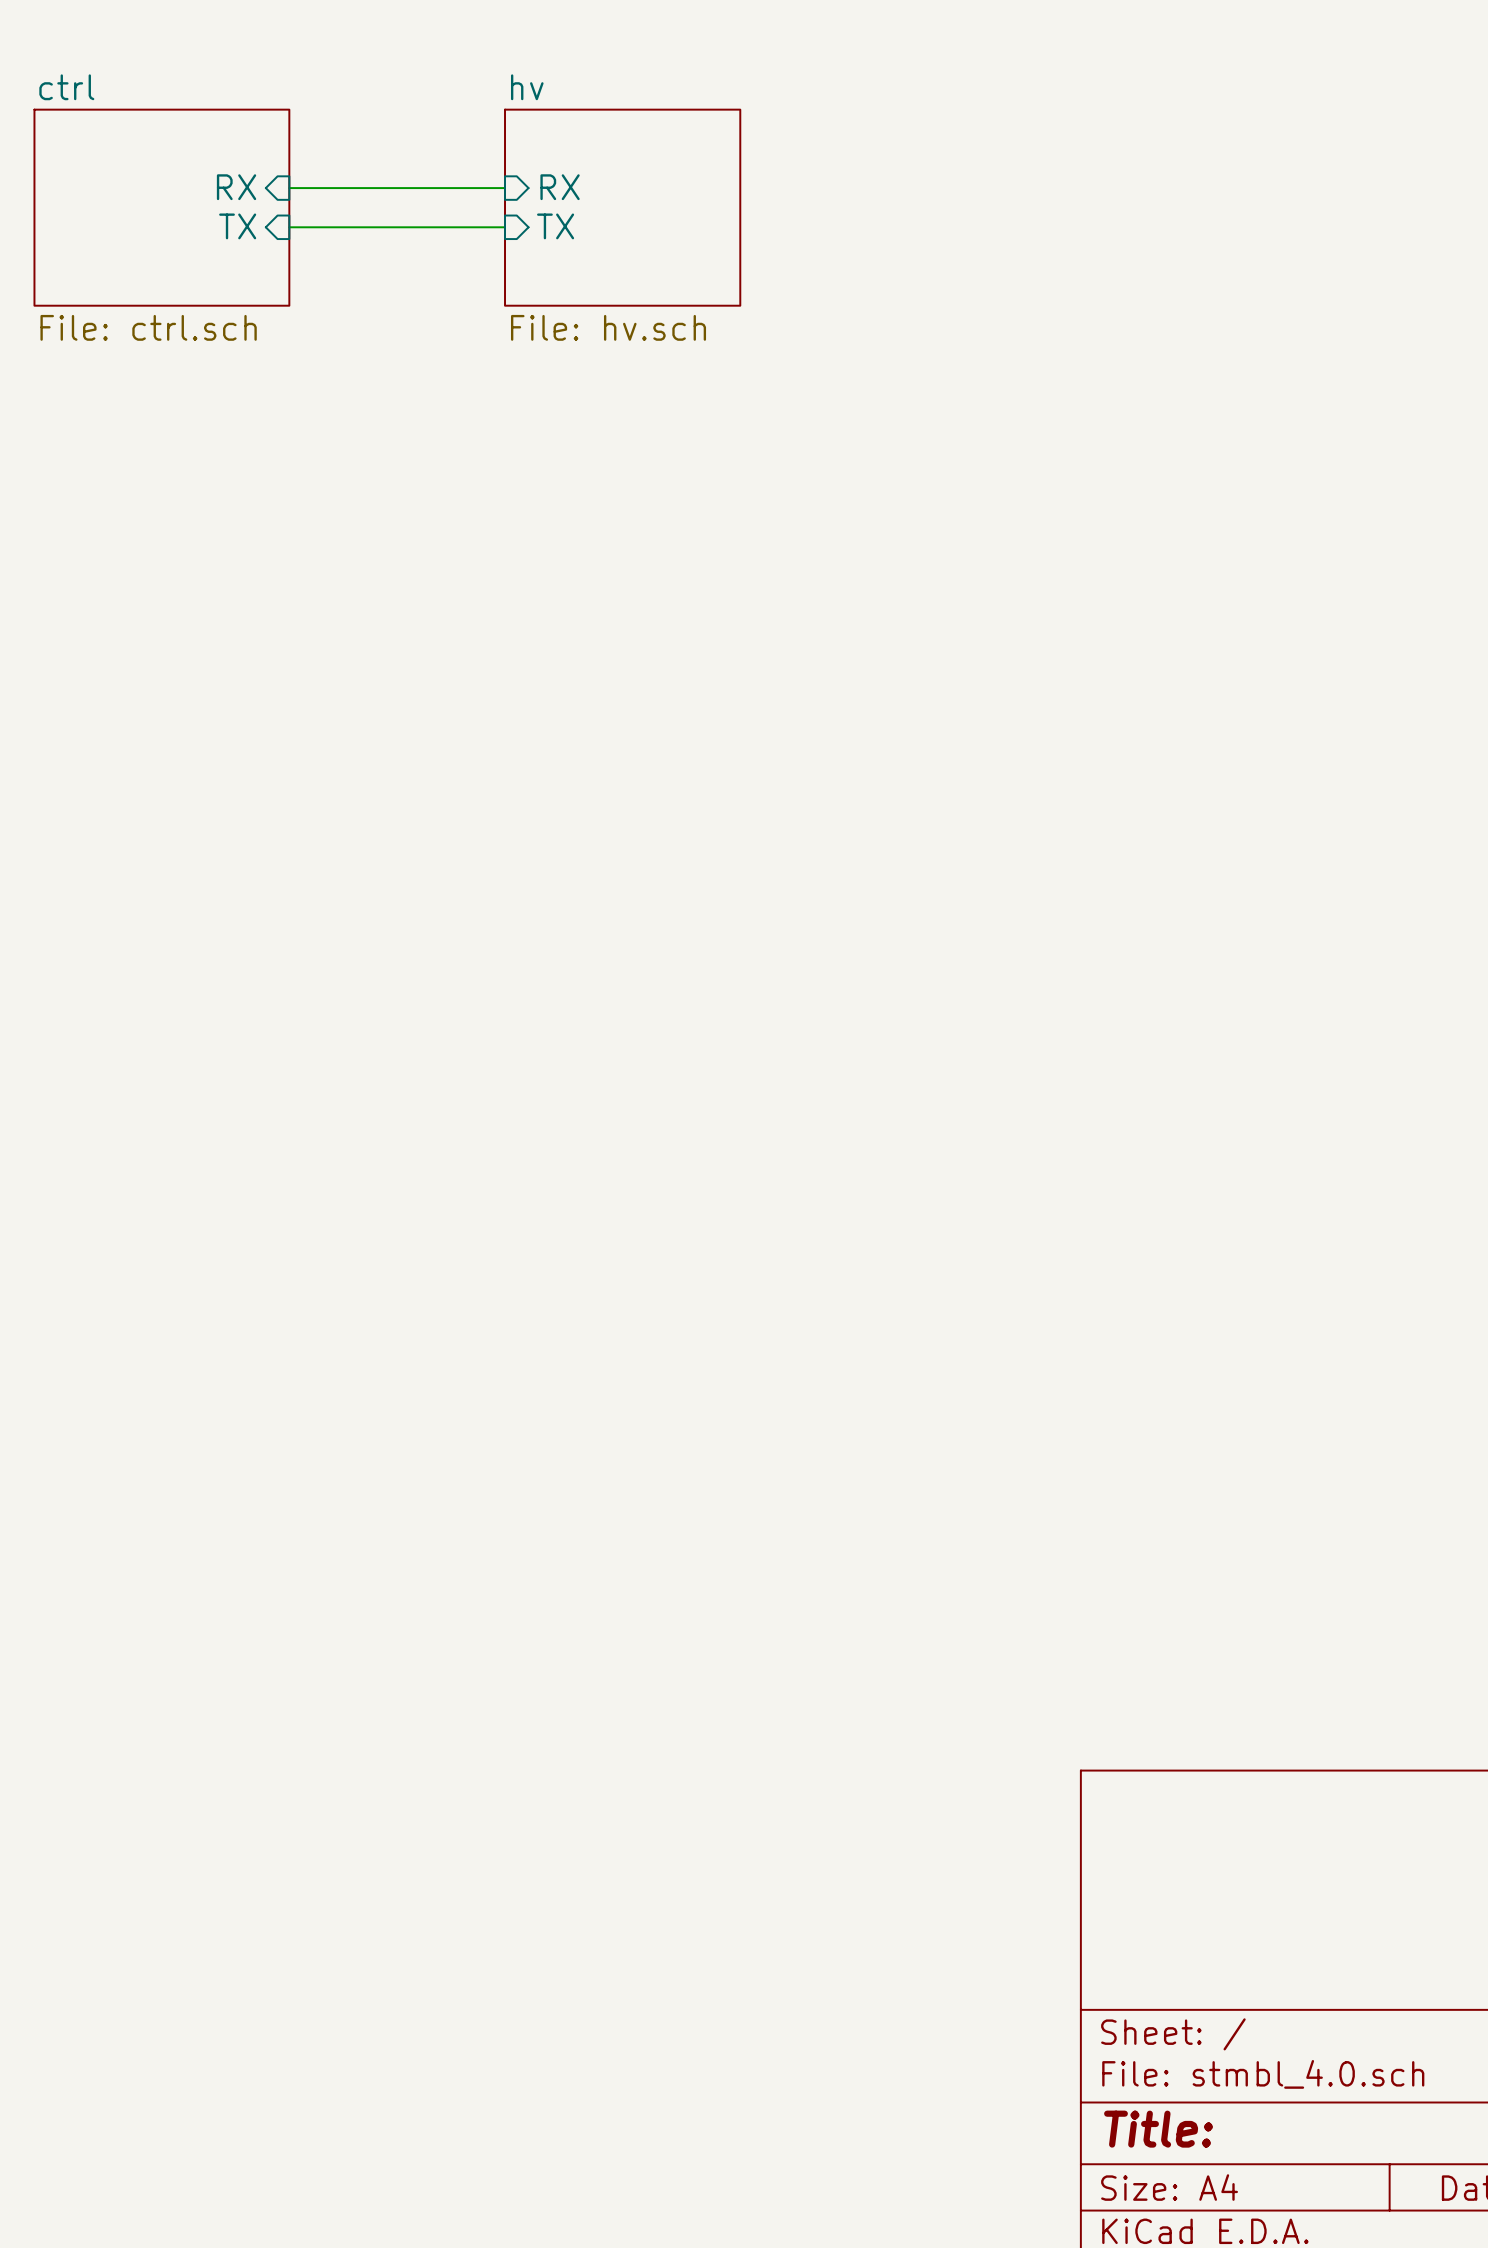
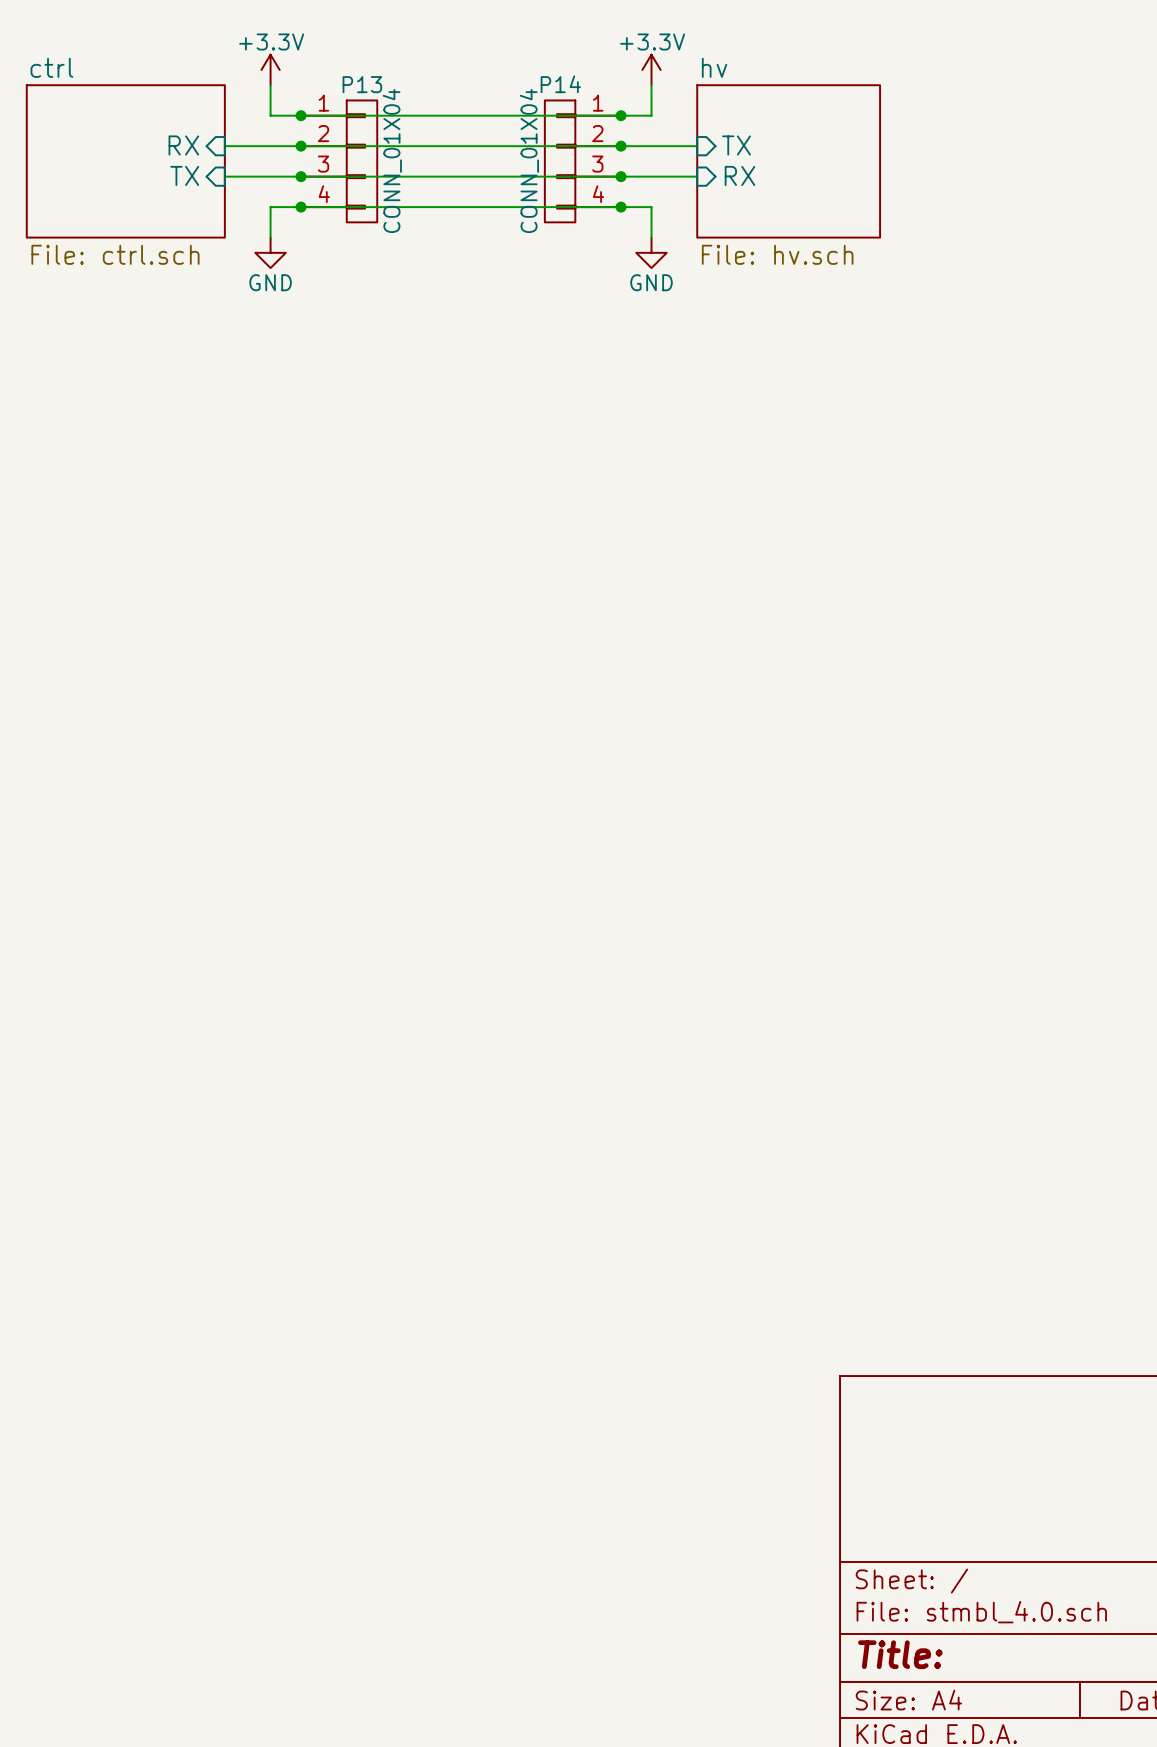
power symbol: none -> +3.3V (270, 69)
power symbol: none -> +3.3V (651, 69)
wire: none -> (270, 85) (270, 115) (651, 115) (651, 85)
junction: none -> (301, 115)
junction: none -> (621, 115)
sheet pin: RX (560, 187) -> none
sheet pin: none -> TX (736, 145)
junction: none -> (301, 146)
wire: none -> (392, 146) (697, 146)
junction: none -> (621, 146)
P13: none -> CONN_01X04 (339, 161)
sheet hv: File: hv.sch (622, 207) -> none
P14: none -> CONN_01X04 (582, 161)
sheet hv: none -> File: hv.sch (788, 161)
sheet pin: TX (555, 226) -> none
sheet pin: none -> RX (740, 175)
junction: none -> (301, 176)
wire: none -> (392, 176) (697, 176)
junction: none -> (621, 176)
junction: none -> (301, 207)
junction: none -> (621, 207)
wire: none -> (270, 237) (270, 207) (651, 207) (651, 237)
power symbol: none -> GND (270, 252)
power symbol: none -> GND (651, 252)

